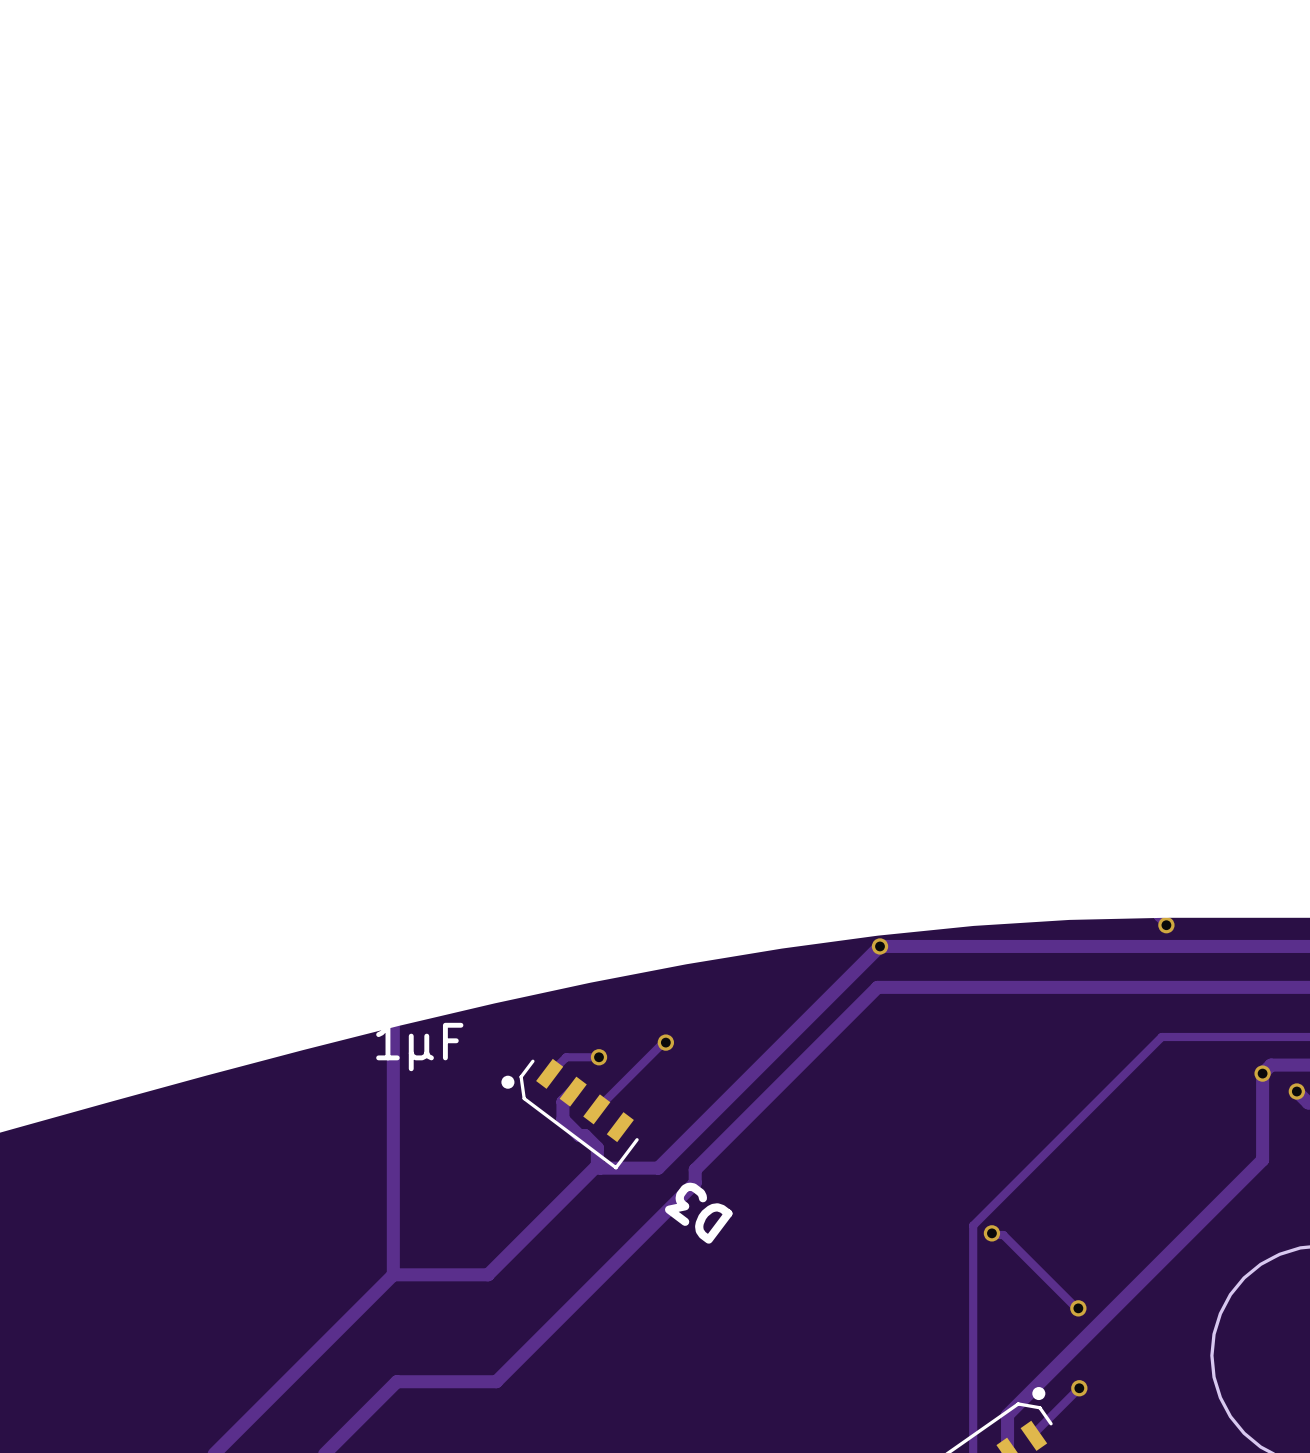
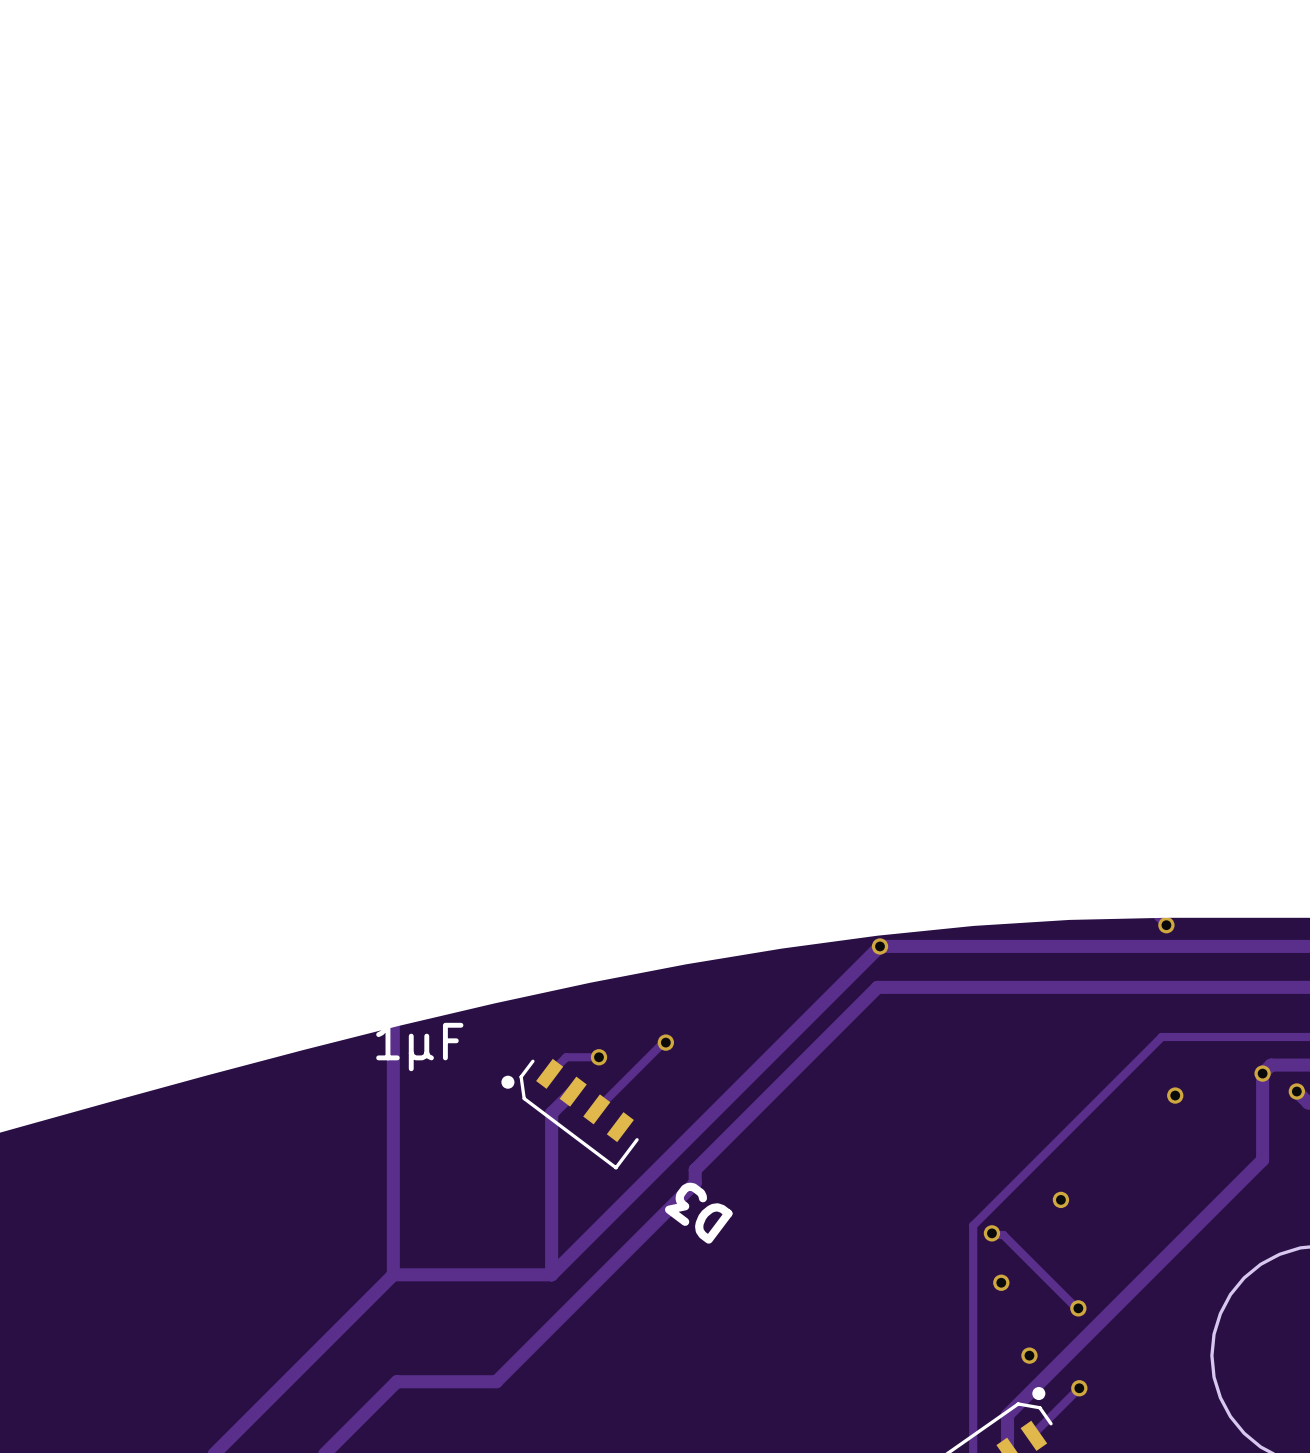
via: none -> (1175, 1095)
track: (562, 1101) (562, 1119) (579, 1135) (584, 1135) (597, 1147) (597, 1165) -> (562, 1101) (551, 1113) (551, 1274)
track: (597, 1165) (600, 1168) (658, 1168) -> (551, 1274) (658, 1168)
track: (597, 1165) (488, 1274) -> (551, 1274) (488, 1274)
via: none -> (1060, 1199)
via: none -> (1001, 1282)
via: none -> (1029, 1355)

